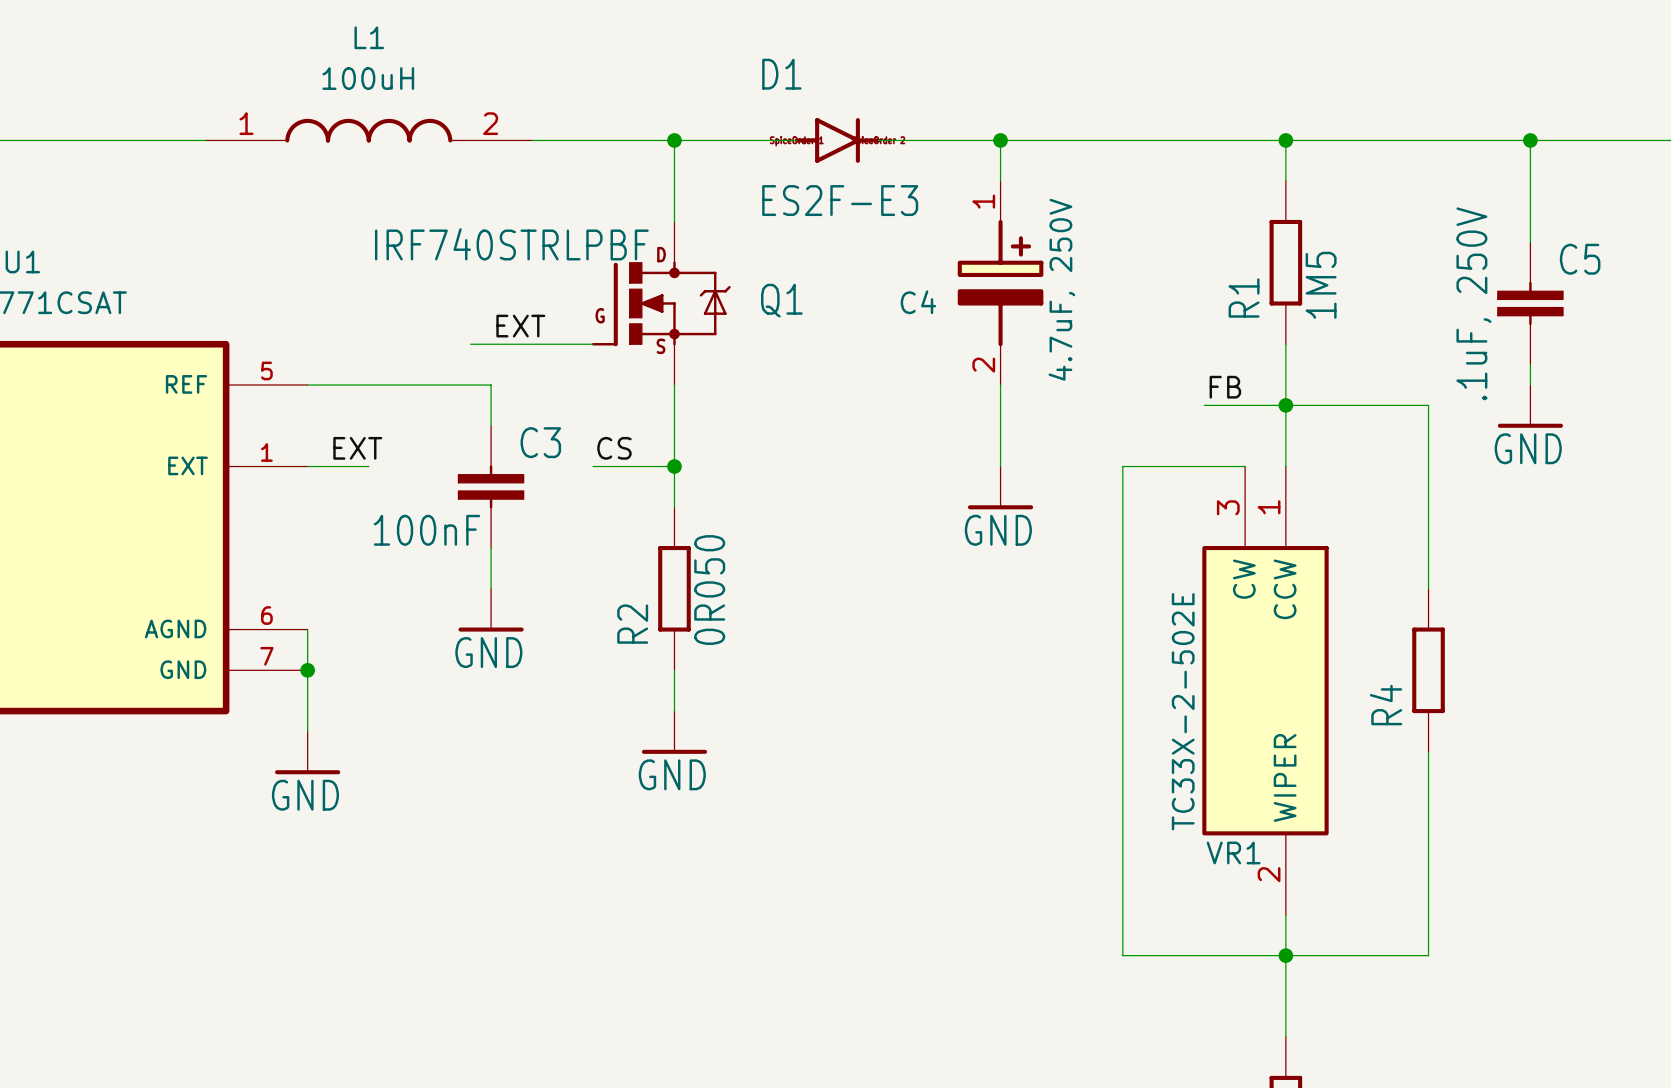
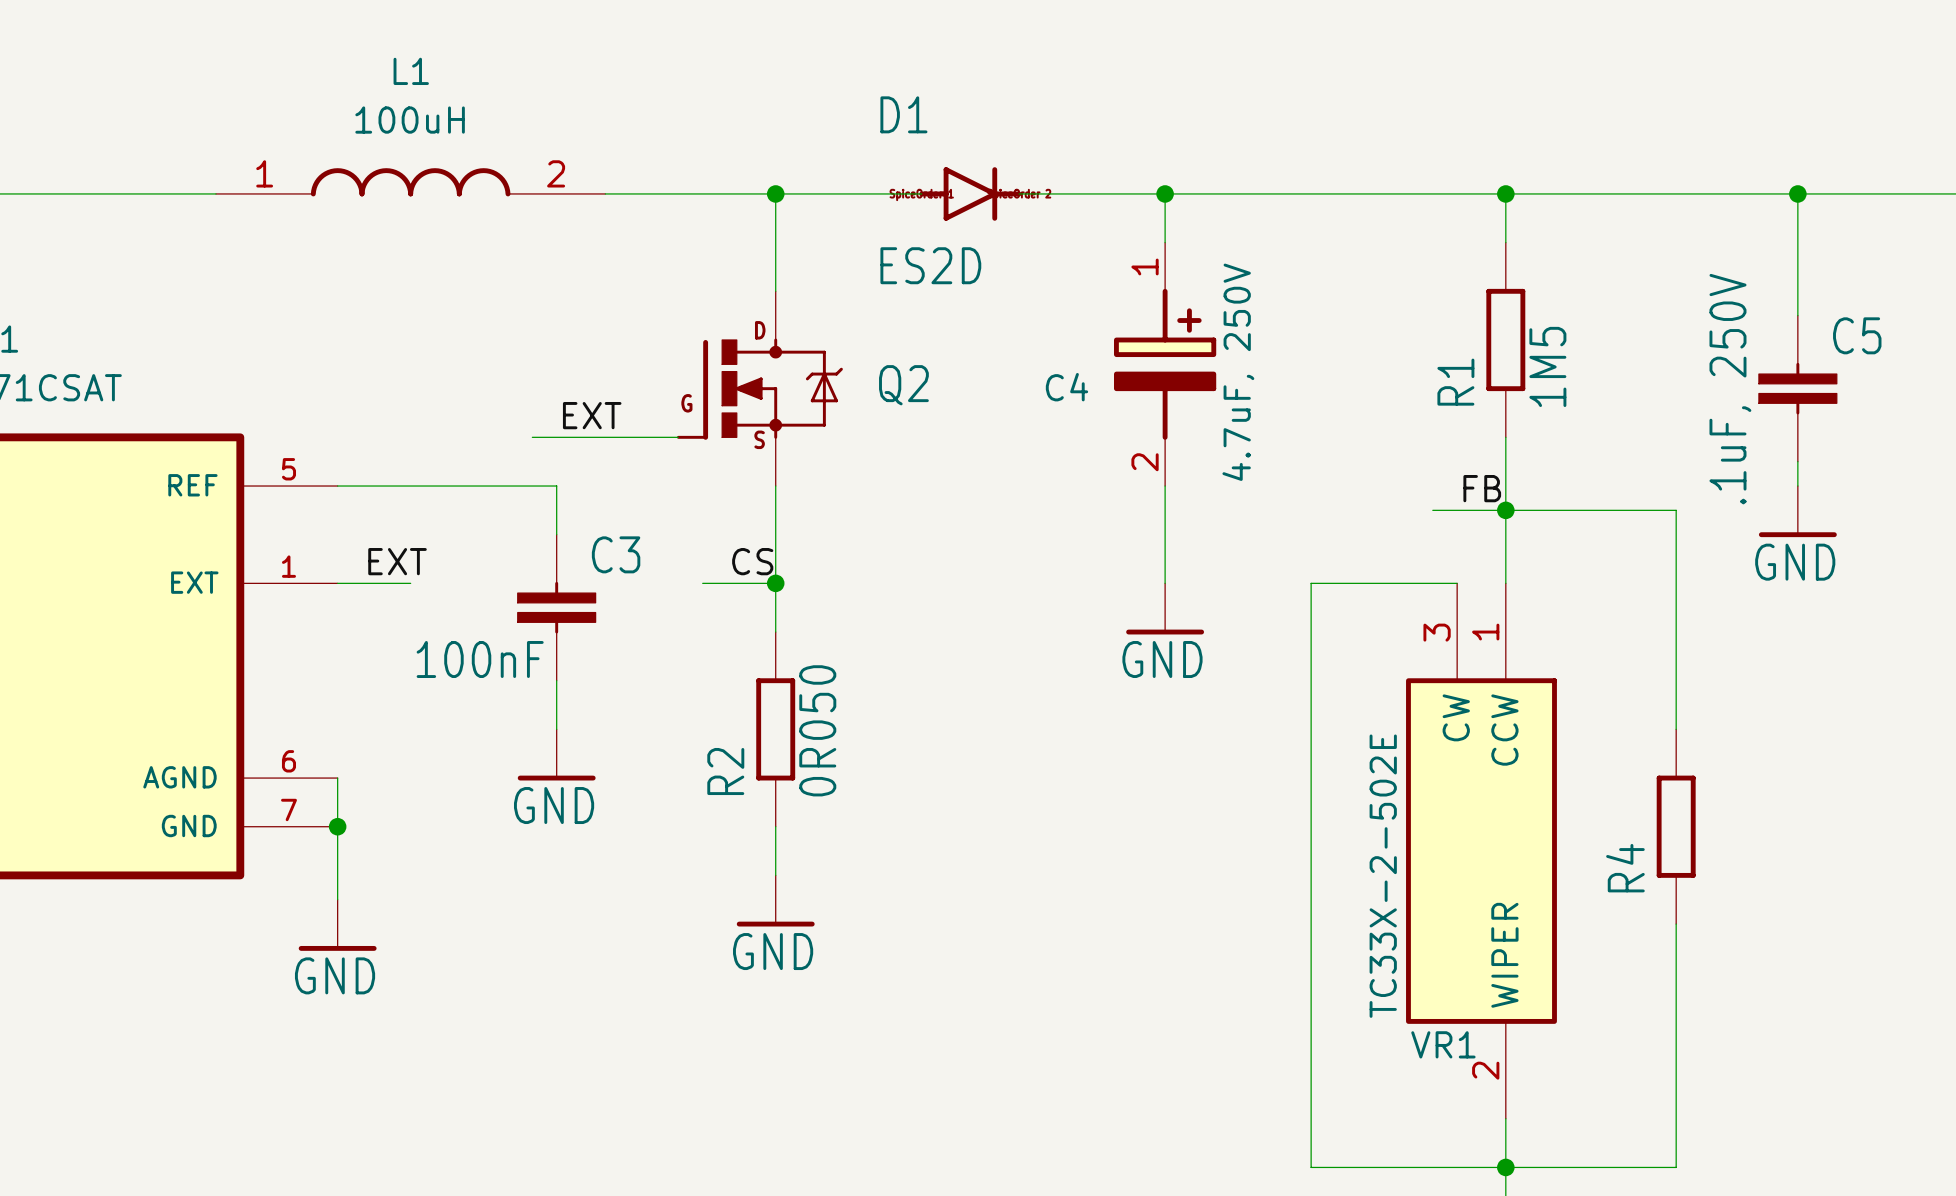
D1 value: ES2F-E3 (840, 200) -> ES2D (930, 265)
Q1 value: IRF740STRLPBF (511, 244) -> none
Q1 name: Q1 (781, 300) -> Q2 (903, 385)
label position: FB (1225, 387) -> FB (1482, 488)
wire: (1204, 405) (1224, 405) -> none
label position: CS (614, 448) -> CS (752, 561)
wire: (592, 466) (613, 466) -> none

